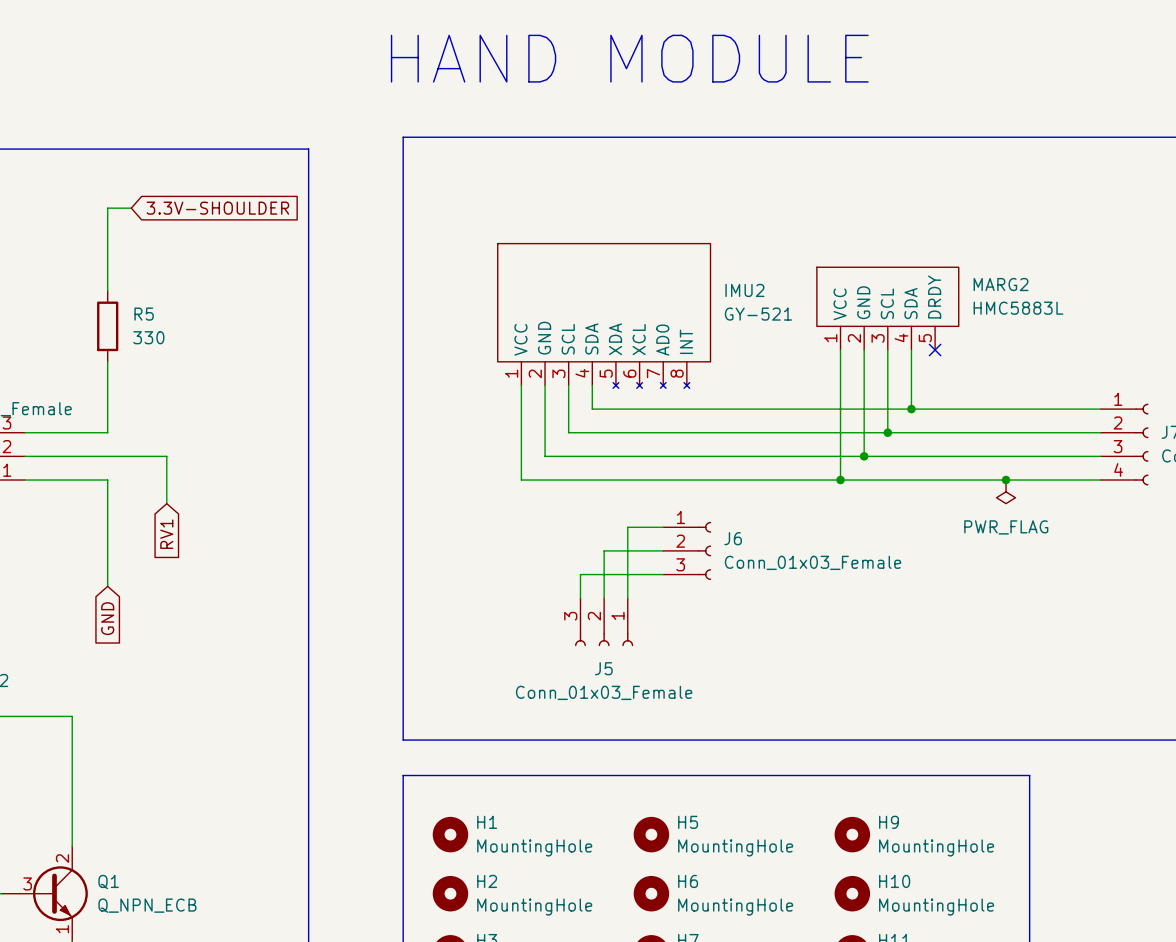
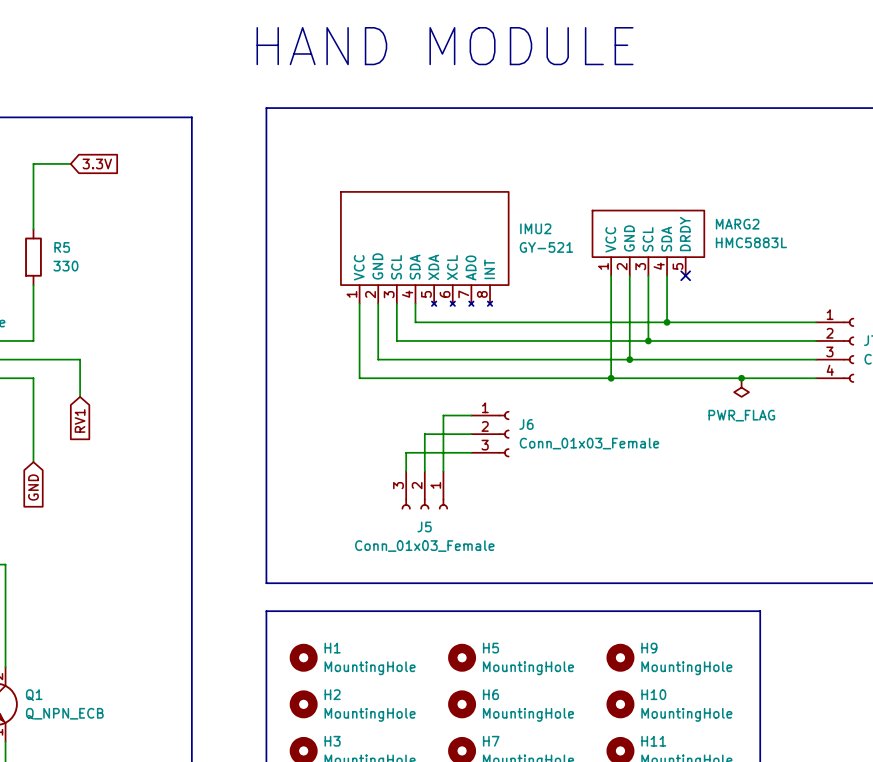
wire: none -> (52, 163) (70, 163)
global label: none -> 3.3V (97, 163)
global label: 3.3V-SHOULDER (217, 208) -> none

